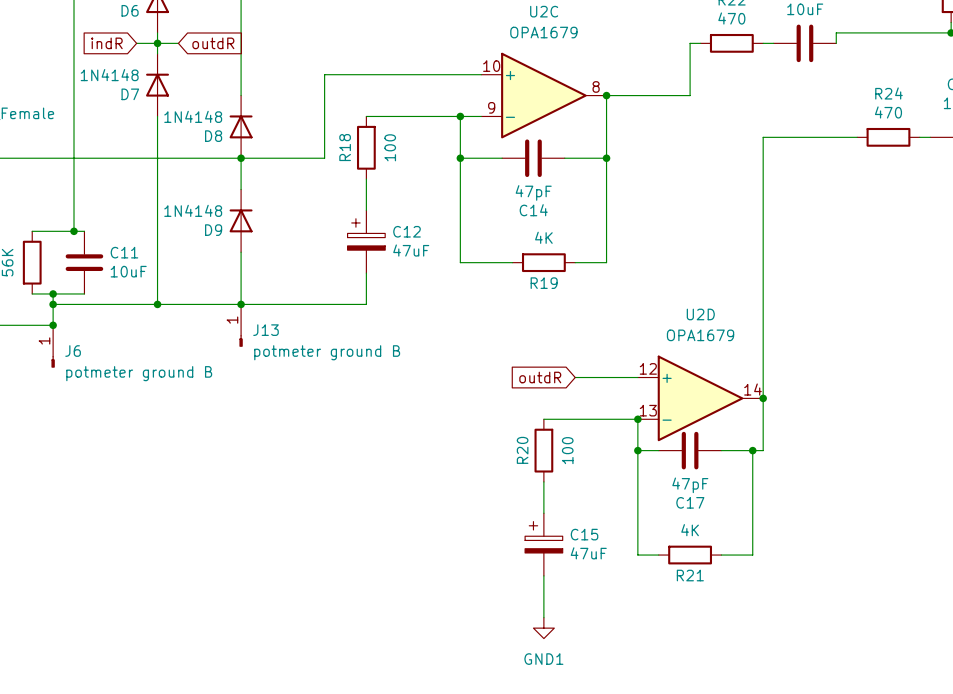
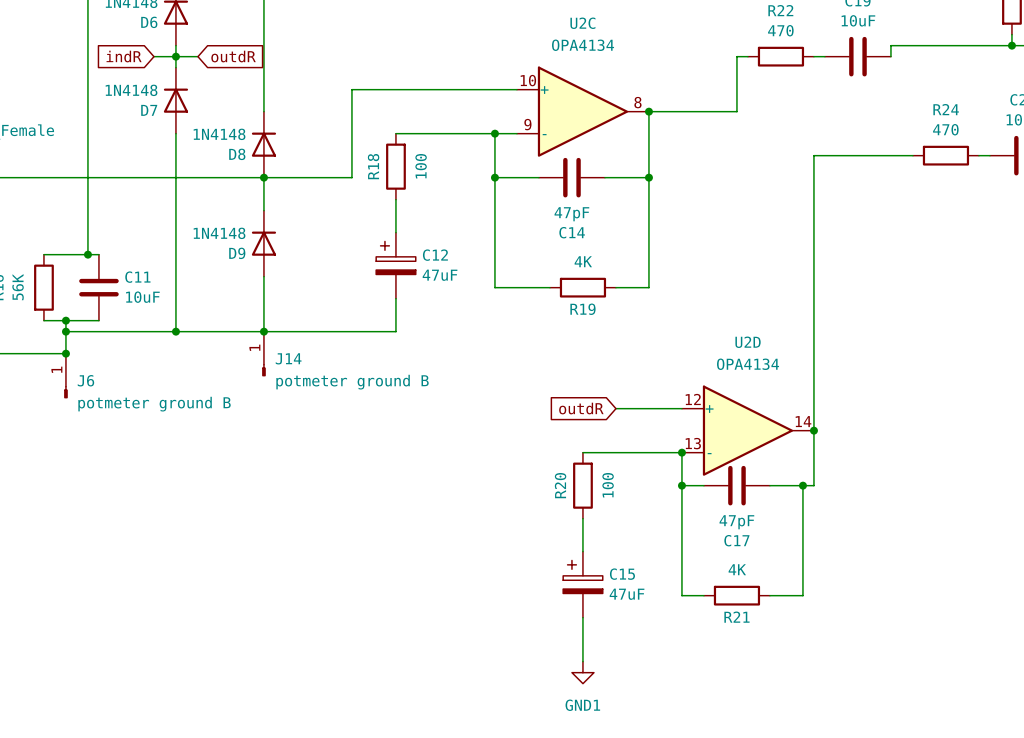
U2C value: OPA1679 (543, 32) -> OPA4134 (583, 45)
J13 name: J13 (266, 330) -> J14 (288, 358)
U2D value: OPA1679 (700, 335) -> OPA4134 (748, 364)

